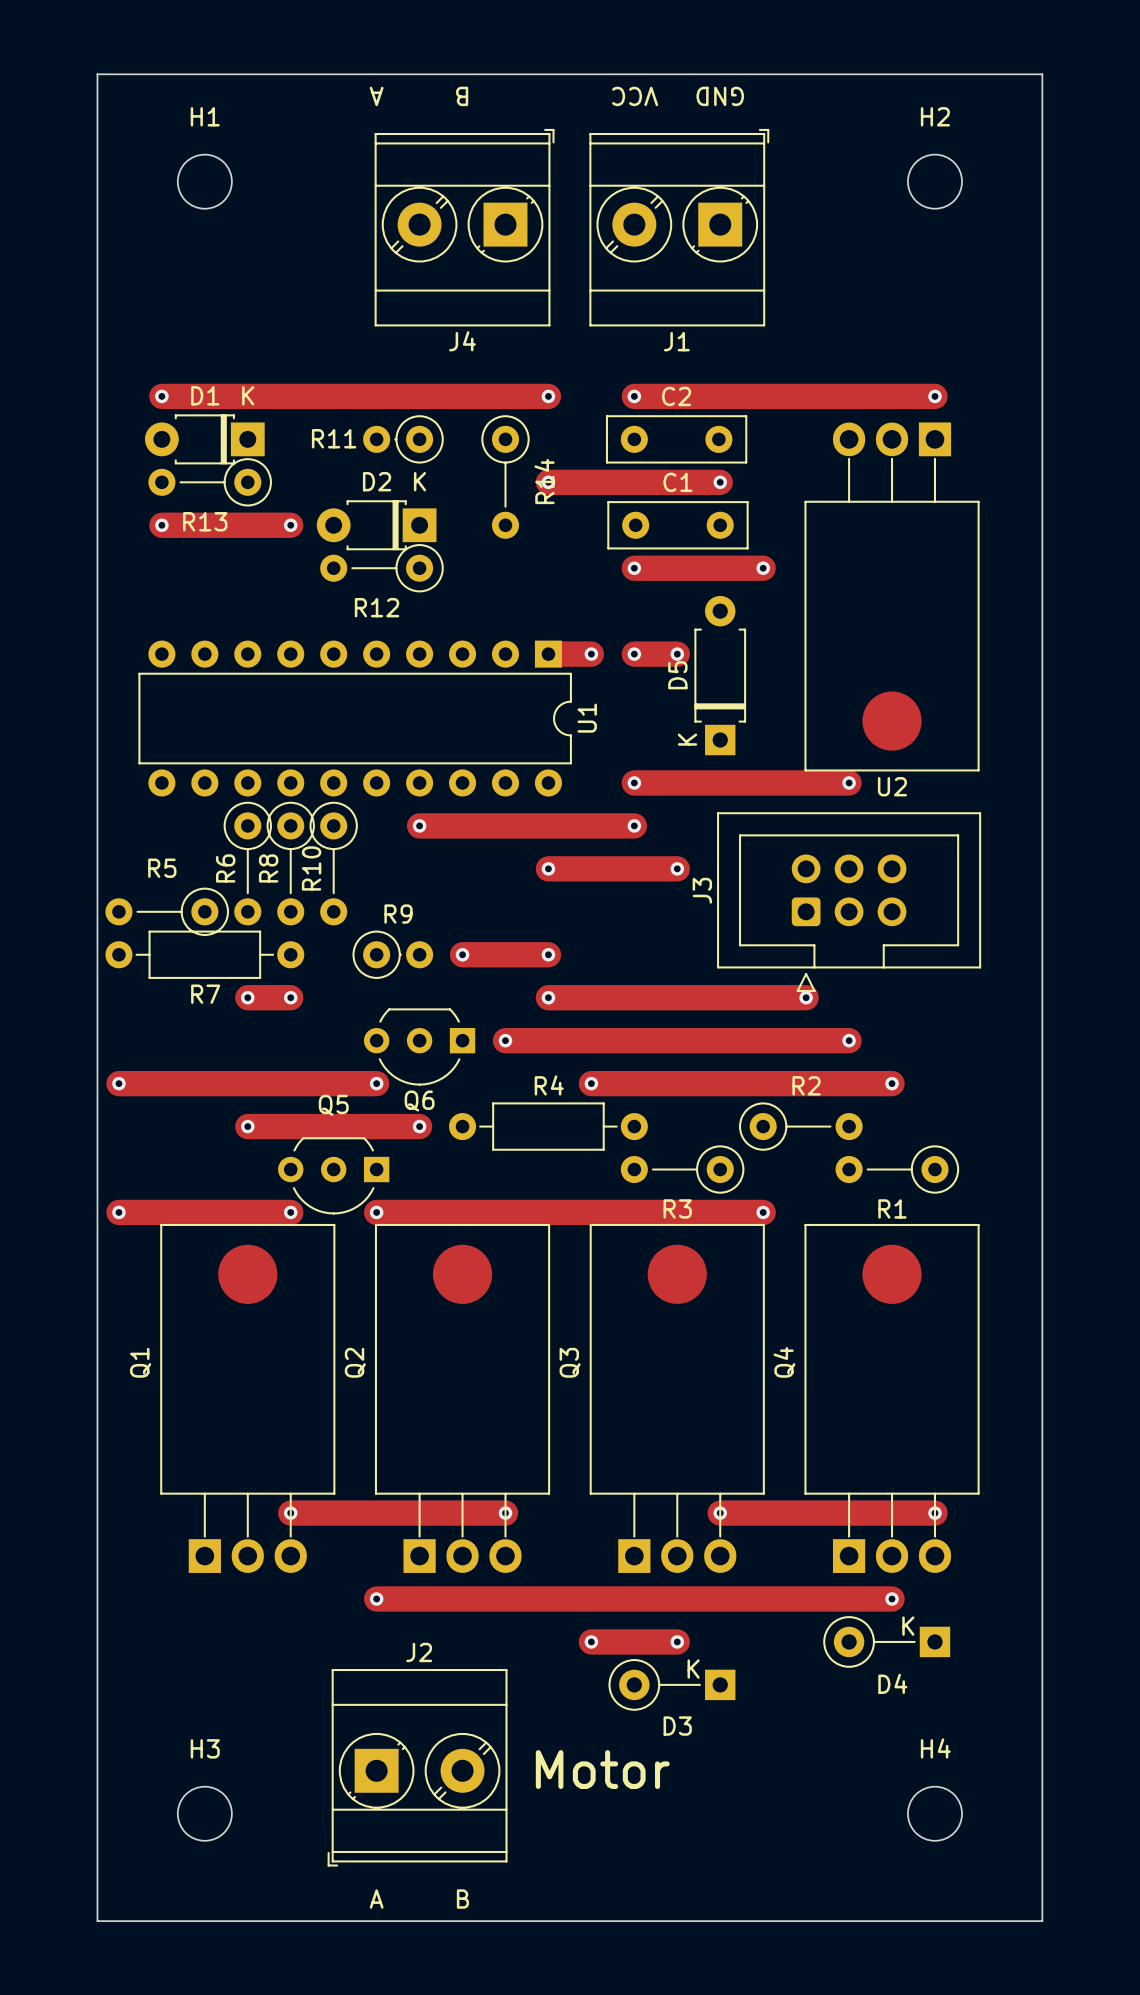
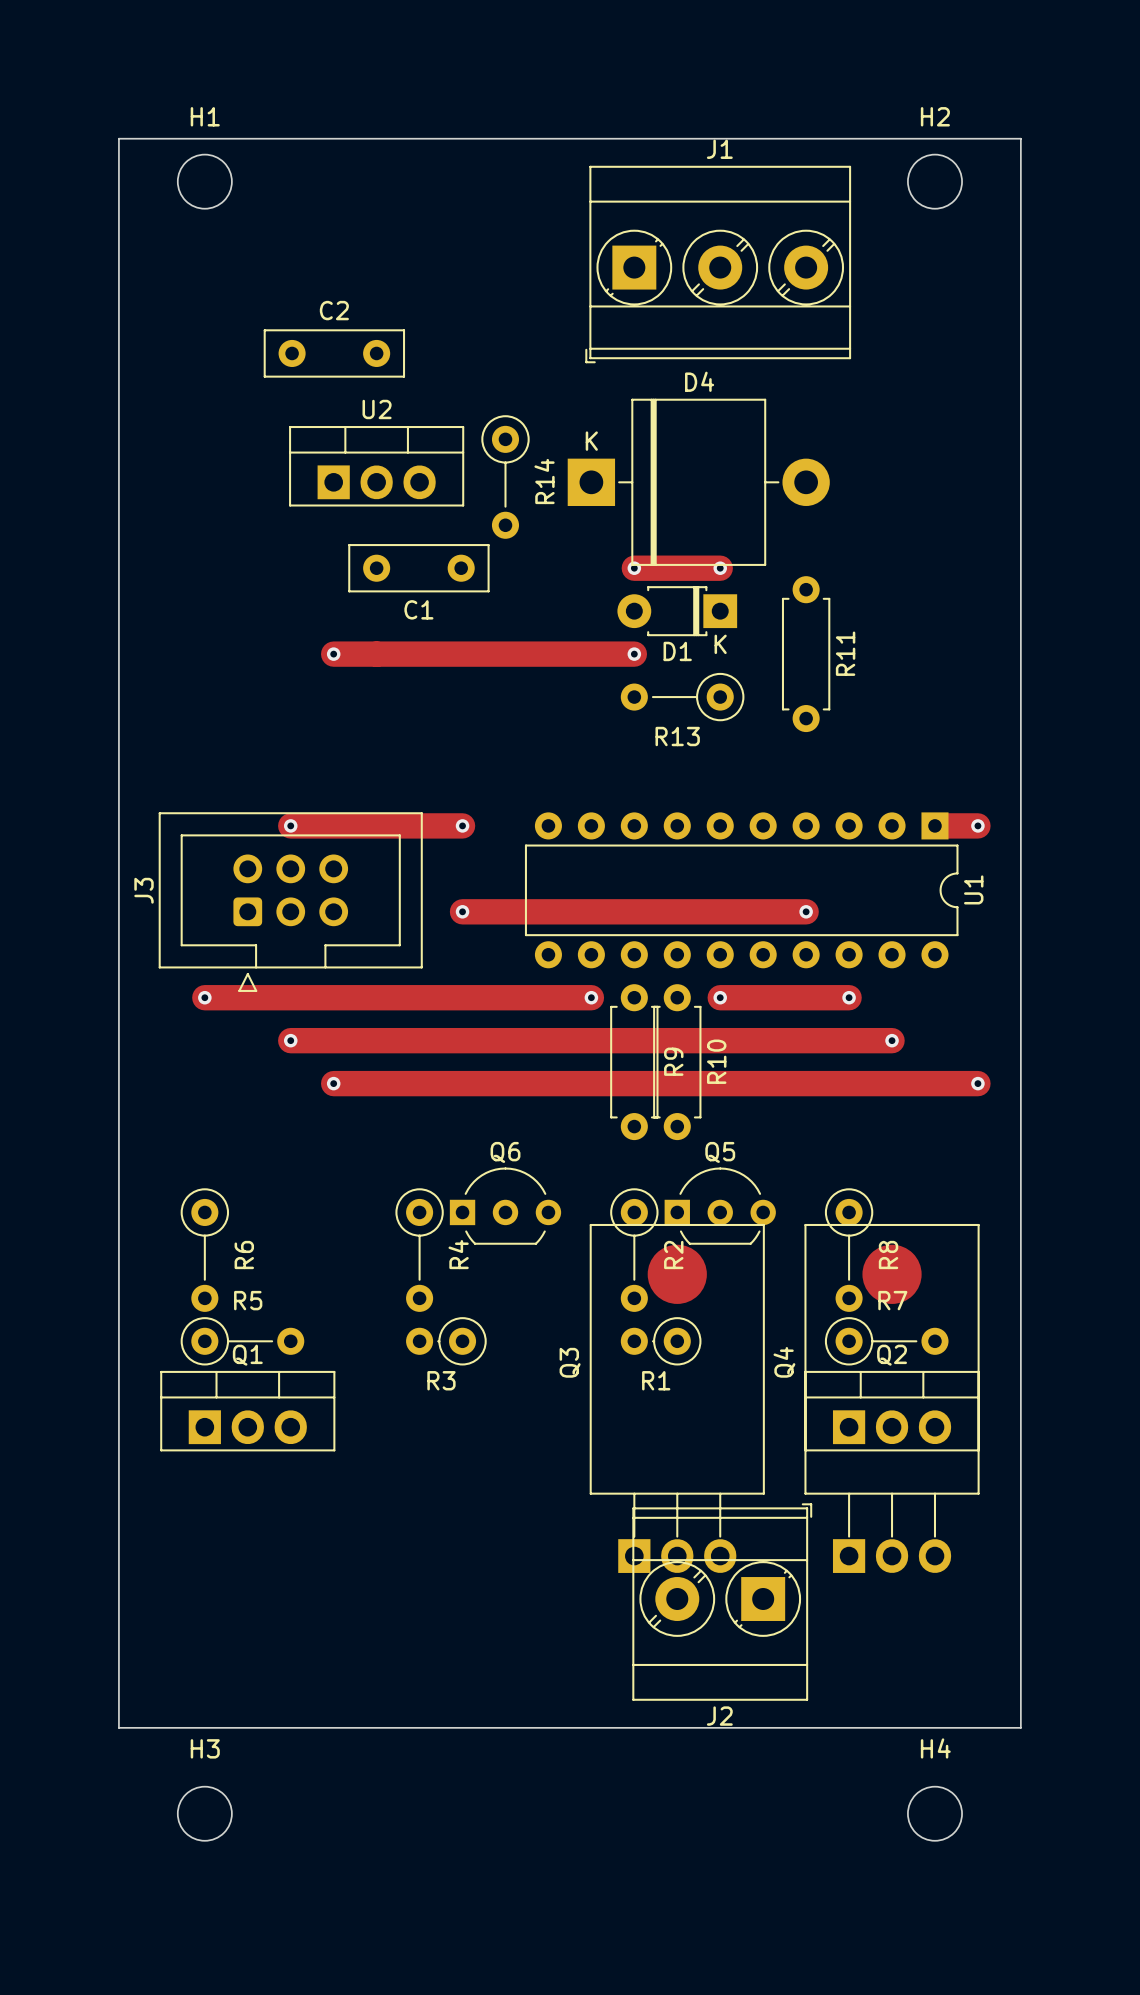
board edge: (97, 74) (1042, 74) (1042, 1921) (97, 1921) (97, 74) -> (118, 138) (118, 1727) (1020, 1727) (1020, 138) (118, 138)
text: A (376, 96) -> none
text: B (462, 96) -> none
text: VCC (635, 96) -> none
text: GND (720, 96) -> none
J1 footprint: [589, 128, 770, 327] -> [585, 165, 852, 364]
J4: (464, 227) -> none
J1 name position: J1 (676, 341) -> J1 (719, 149)
D1 name position: D1 (205, 395) -> D1 (677, 651)
D1 text position: K (248, 395) -> K (720, 644)
track: (161, 396) (548, 396) -> none
via: (161, 396) -> none
via: (548, 396) -> none
track: (634, 396) (934, 396) -> none
via: (634, 396) -> none
via: (934, 396) -> none
R11 footprint: [363, 415, 444, 464] -> [781, 576, 831, 733]
U2 footprint: [804, 422, 980, 772] -> [289, 426, 465, 507]
R11 name position: R11 (334, 438) -> R11 (845, 653)
D1 position: (204, 439) -> (677, 611)
C2 position: (676, 439) -> (334, 353)
R13 position: (210, 482) -> (682, 697)
track: (548, 482) (720, 482) -> none
via: (548, 482) -> none
C1 name position: C1 (677, 482) -> C1 (418, 609)
via: (720, 482) -> none
track: (161, 525) (290, 525) -> none
via: (161, 525) -> none
via: (290, 525) -> none
D2: (376, 525) -> none
C1 position: (677, 525) -> (418, 568)
R12: (381, 568) -> none
track: (720, 568) (763, 568) -> (934, 825) (977, 825)
via: none -> (720, 568)
via: (763, 568) -> none
via: none -> (333, 654)
via: (591, 654) -> none
track: (634, 654) (677, 654) -> (634, 654) (591, 654)
via: (677, 654) -> none
D5: (720, 675) -> none
U1 position: (355, 718) -> (741, 890)
track: (634, 782) (849, 782) -> (333, 654) (548, 654)
via: (634, 782) -> none
via: (849, 782) -> none
U2 name position: U2 (892, 786) -> U2 (377, 409)
R10 footprint: [309, 801, 358, 926] -> [653, 984, 702, 1141]
via: none -> (290, 825)
via position: (419, 825) -> (462, 825)
track: (462, 825) (634, 825) -> none
via: (634, 825) -> none
via: none -> (977, 825)
R6 position: (247, 863) -> (204, 1250)
R8 position: (290, 863) -> (849, 1250)
R6 name position: R6 (225, 868) -> R6 (244, 1255)
R8 name position: R8 (268, 868) -> R8 (888, 1255)
R10 name position: R10 (311, 868) -> R10 (716, 1061)
track: (548, 868) (677, 868) -> (290, 825) (419, 825)
via: (548, 868) -> none
via: (677, 868) -> none
J3 position: (849, 902) -> (290, 902)
R5 rotation: 0° (167, 911) -> 180° (242, 1341)
R5 position: (167, 911) -> (242, 1341)
track: none -> (462, 911) (806, 911)
via: none -> (806, 911)
R9 name position: R9 (398, 914) -> R9 (673, 1061)
R7 footprint: [105, 930, 305, 979] -> [824, 1317, 949, 1366]
R9 footprint: [352, 930, 434, 979] -> [610, 984, 659, 1141]
track: (462, 954) (548, 954) -> none
via position: (462, 954) -> (462, 911)
via: (548, 954) -> none
R7 name position: R7 (205, 994) -> R7 (892, 1300)
track: none -> (204, 997) (247, 997)
via: none -> (204, 997)
via: (247, 997) -> none
track: none -> (290, 997) (548, 997)
via: (290, 997) -> none
via: (548, 997) -> none
track: (591, 997) (720, 997) -> none
via: none -> (591, 997)
via: none -> (720, 997)
track: none -> (806, 997) (849, 997)
via: (806, 997) -> none
via: none -> (849, 997)
via: none -> (290, 1040)
via: (505, 1040) -> none
track: none -> (849, 1040) (892, 1040)
via: (849, 1040) -> none
via: none -> (892, 1040)
Q6 rotation: 0° (419, 1047) -> 180° (505, 1206)
Q6 position: (419, 1047) -> (505, 1206)
track: (118, 1083) (333, 1083) -> (290, 1040) (505, 1040)
via: (118, 1083) -> none
track: none -> (376, 1083) (591, 1083)
via position: (376, 1083) -> (333, 1083)
via: (591, 1083) -> none
track: none -> (892, 1083) (977, 1083)
via: (892, 1083) -> none
via: none -> (977, 1083)
R4 name position: R4 (549, 1085) -> R4 (458, 1254)
R4 footprint: [449, 1102, 648, 1151] -> [395, 1188, 444, 1312]
track: (247, 1126) (419, 1126) -> none
via: (247, 1126) -> none
via: (419, 1126) -> none
R2 rotation: 0° (800, 1126) -> 90° clockwise (634, 1250)
R2 position: (800, 1126) -> (634, 1250)
R3 footprint: [620, 1145, 745, 1194] -> [406, 1317, 487, 1366]
R1 footprint: [835, 1145, 960, 1194] -> [620, 1317, 702, 1366]
Q5 rotation: 0° (333, 1175) -> 180° (720, 1206)
Q5 position: (333, 1175) -> (720, 1206)
track: (118, 1212) (290, 1212) -> none
via: (118, 1212) -> none
via: (290, 1212) -> none
track: (376, 1212) (763, 1212) -> none
via: (376, 1212) -> none
via: (763, 1212) -> none
Q1 footprint: [160, 1223, 336, 1573] -> [160, 1370, 336, 1452]
Q2 footprint: [374, 1223, 551, 1573] -> [804, 1370, 980, 1452]
Q1 name position: Q1 (140, 1362) -> Q1 (247, 1355)
Q2 name position: Q2 (355, 1362) -> Q2 (892, 1355)
track: (290, 1513) (505, 1513) -> none
via: (290, 1513) -> none
via: (505, 1513) -> none
track: (720, 1513) (934, 1513) -> none
via: (720, 1513) -> none
via: (934, 1513) -> none
track: (376, 1599) (892, 1599) -> none
via: (376, 1599) -> none
via: (892, 1599) -> none
D4 footprint: [823, 1616, 951, 1668] -> [567, 398, 830, 566]
track: (591, 1641) (677, 1641) -> none
via: (591, 1641) -> none
via: (677, 1641) -> none
D4 name position: D4 (892, 1683) -> D4 (699, 381)
D3: (671, 1684) -> none
J2 rotation: 0° (417, 1767) -> 180° (722, 1602)
J2 position: (417, 1767) -> (722, 1602)
text: Motor (602, 1769) -> none
text: A (376, 1899) -> none
text: B (462, 1899) -> none

